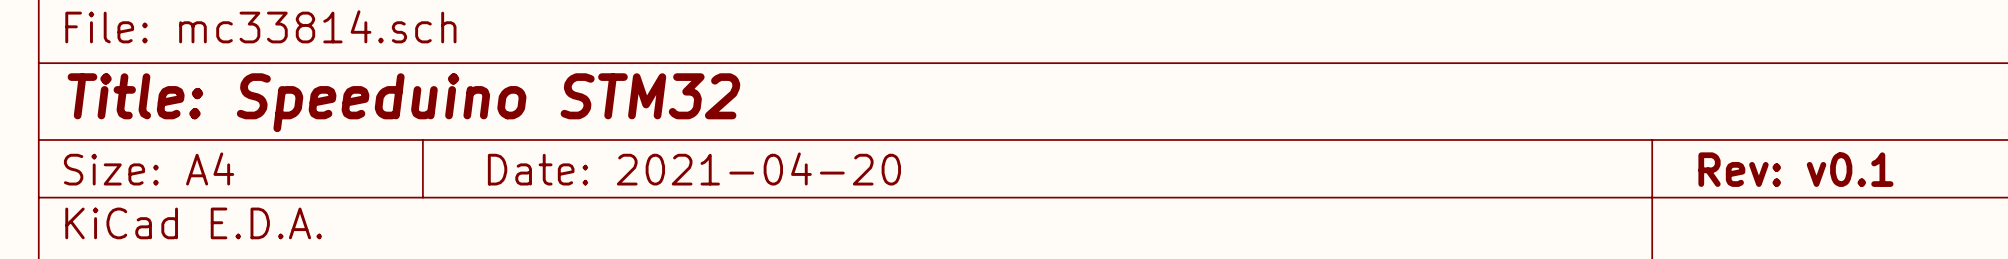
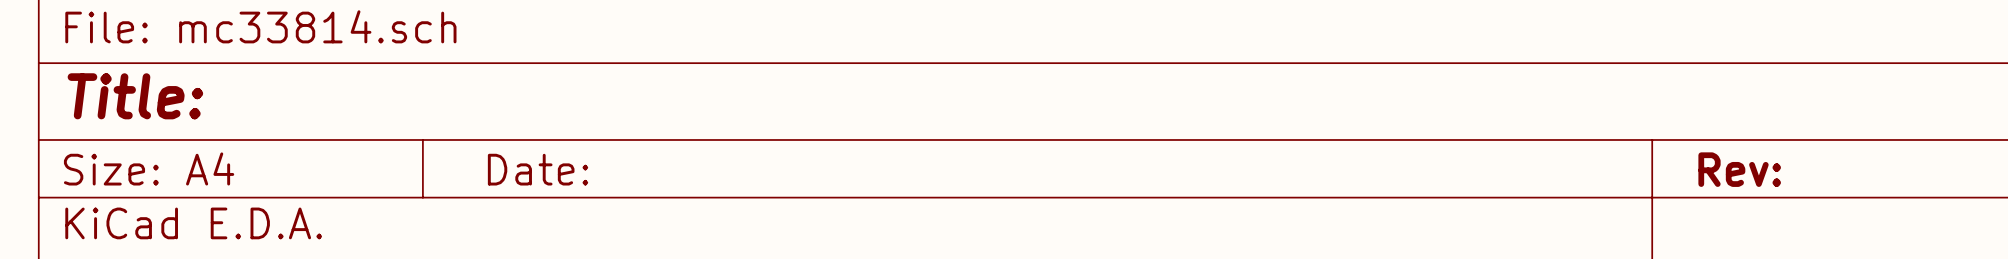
title block: Title: Speeduino STM32 (403, 102) -> Title: (135, 96)
title block: Date: 2021-04-20 (694, 168) -> Date: (538, 169)
title block: Rev: v0.1 (1795, 169) -> Rev: (1739, 169)

